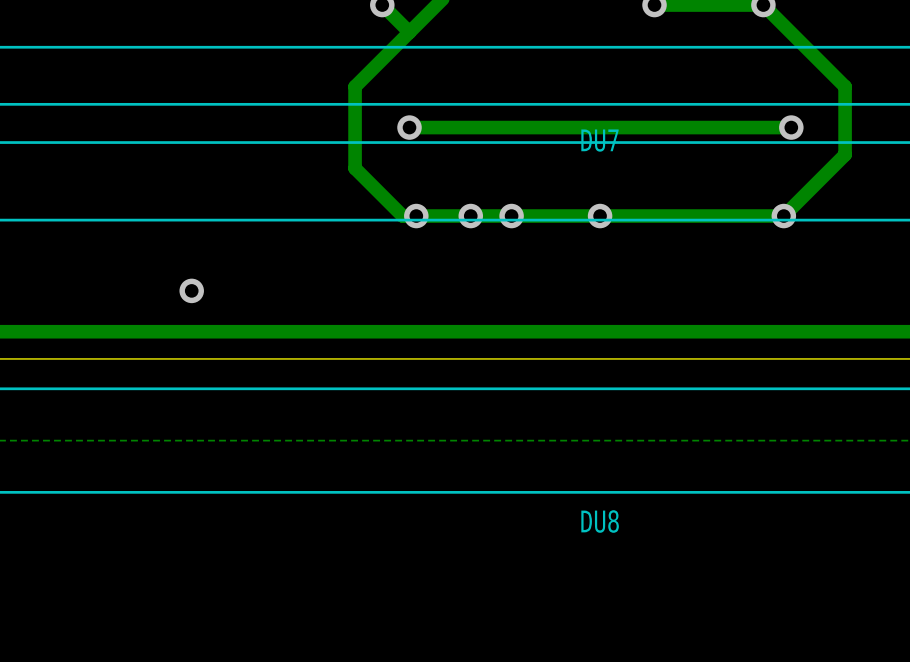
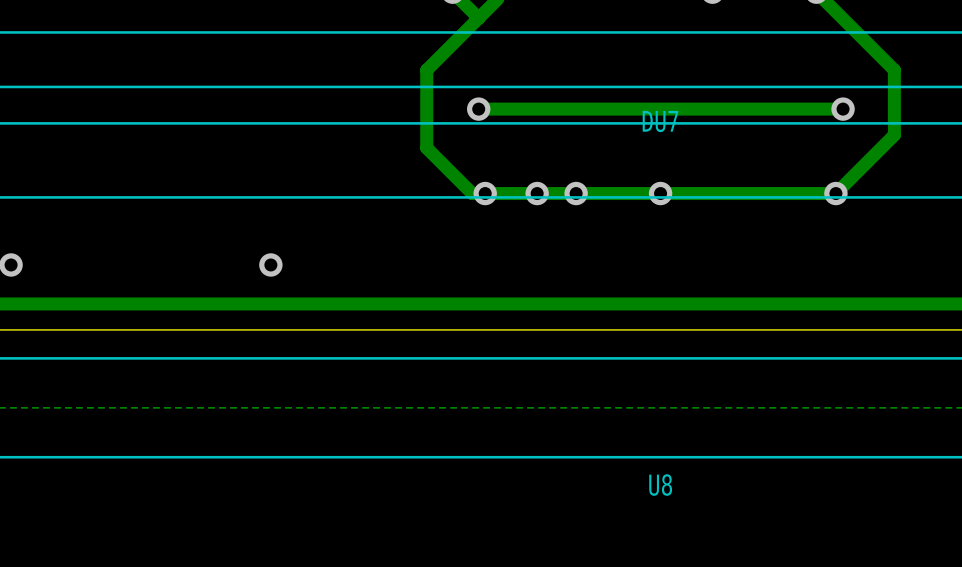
DU8 name: DU8 (600, 521) -> U8 (660, 485)

